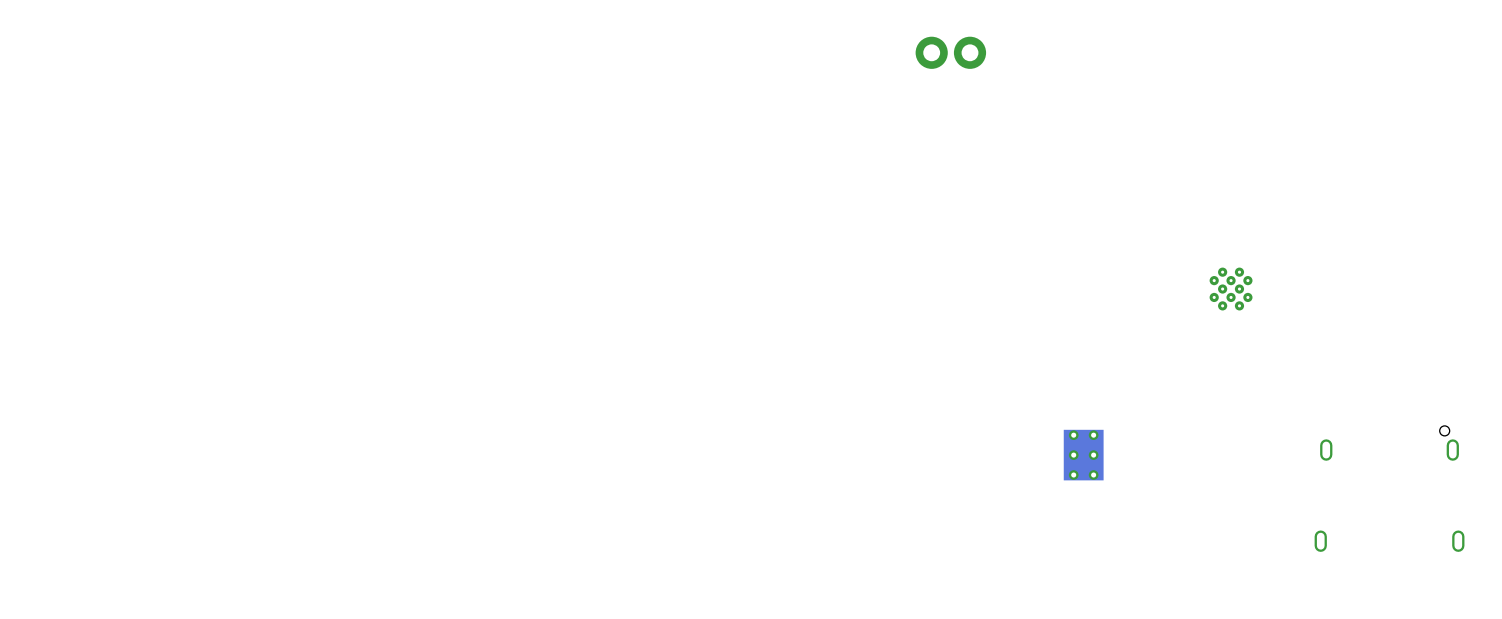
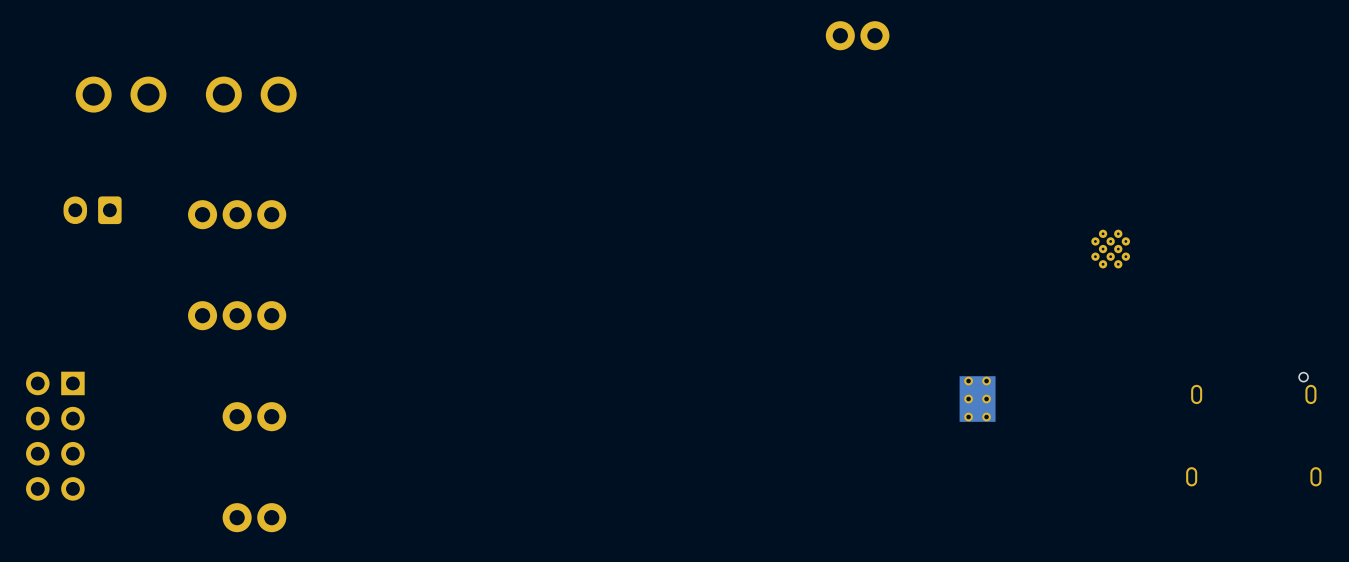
part: none -> (121, 94)
part: none -> (251, 94)
part: none -> (92, 210)
part: none -> (237, 214)
part: none -> (237, 315)
part: none -> (254, 416)
part: none -> (55, 436)
part: none -> (254, 517)

